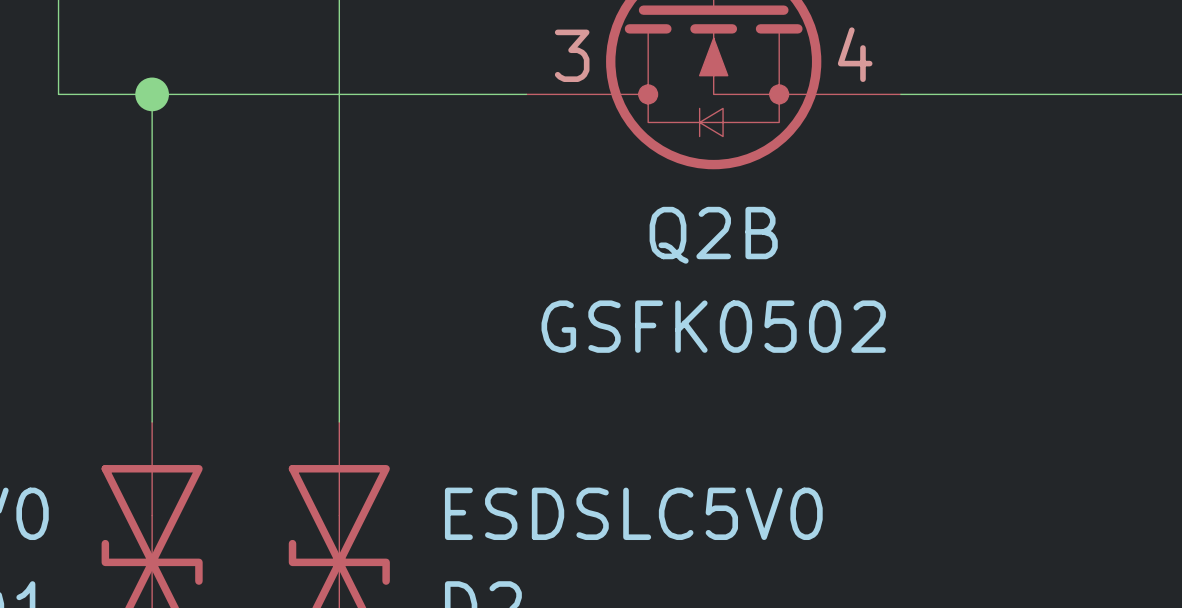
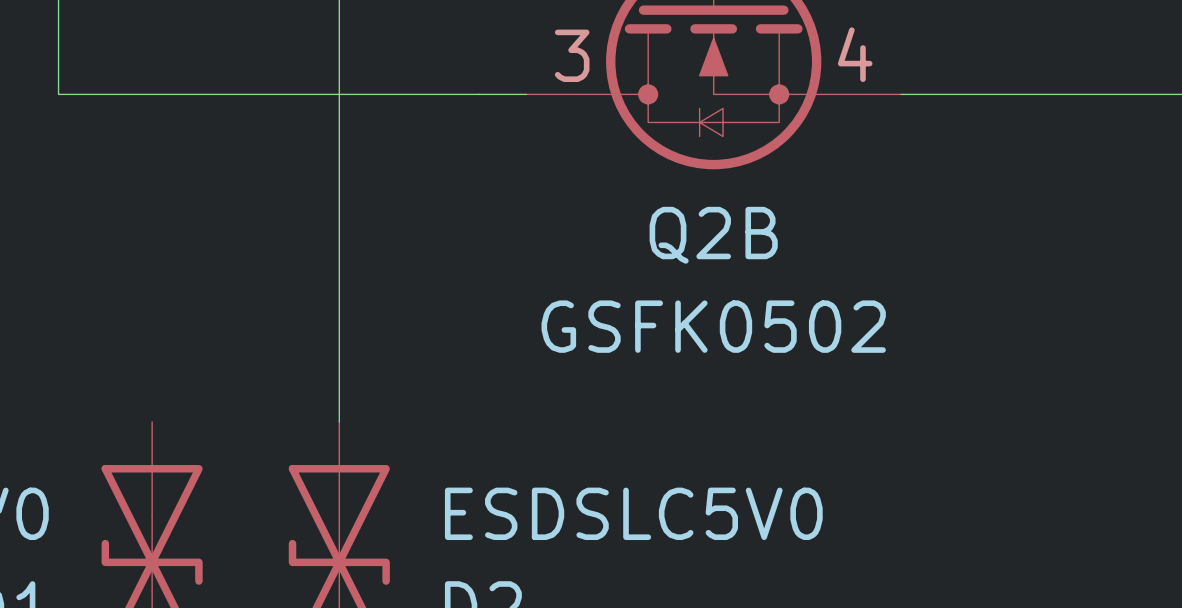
wire: (152, 94) (152, 421) -> none
junction: (152, 94) -> none

